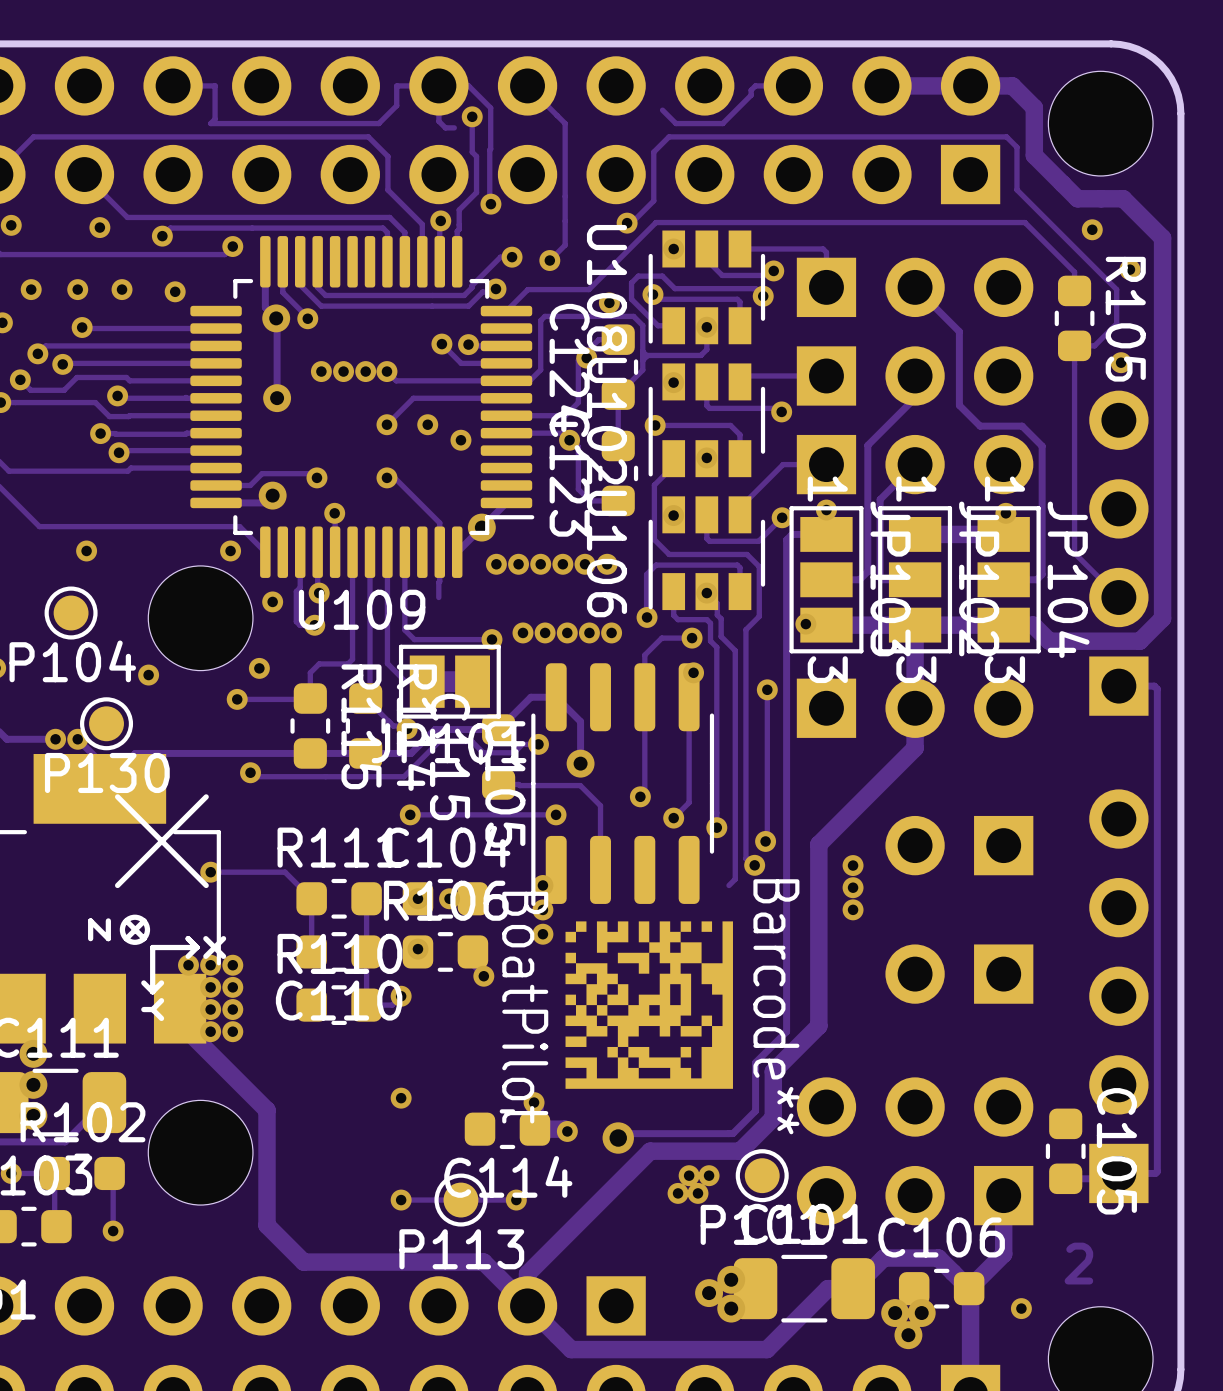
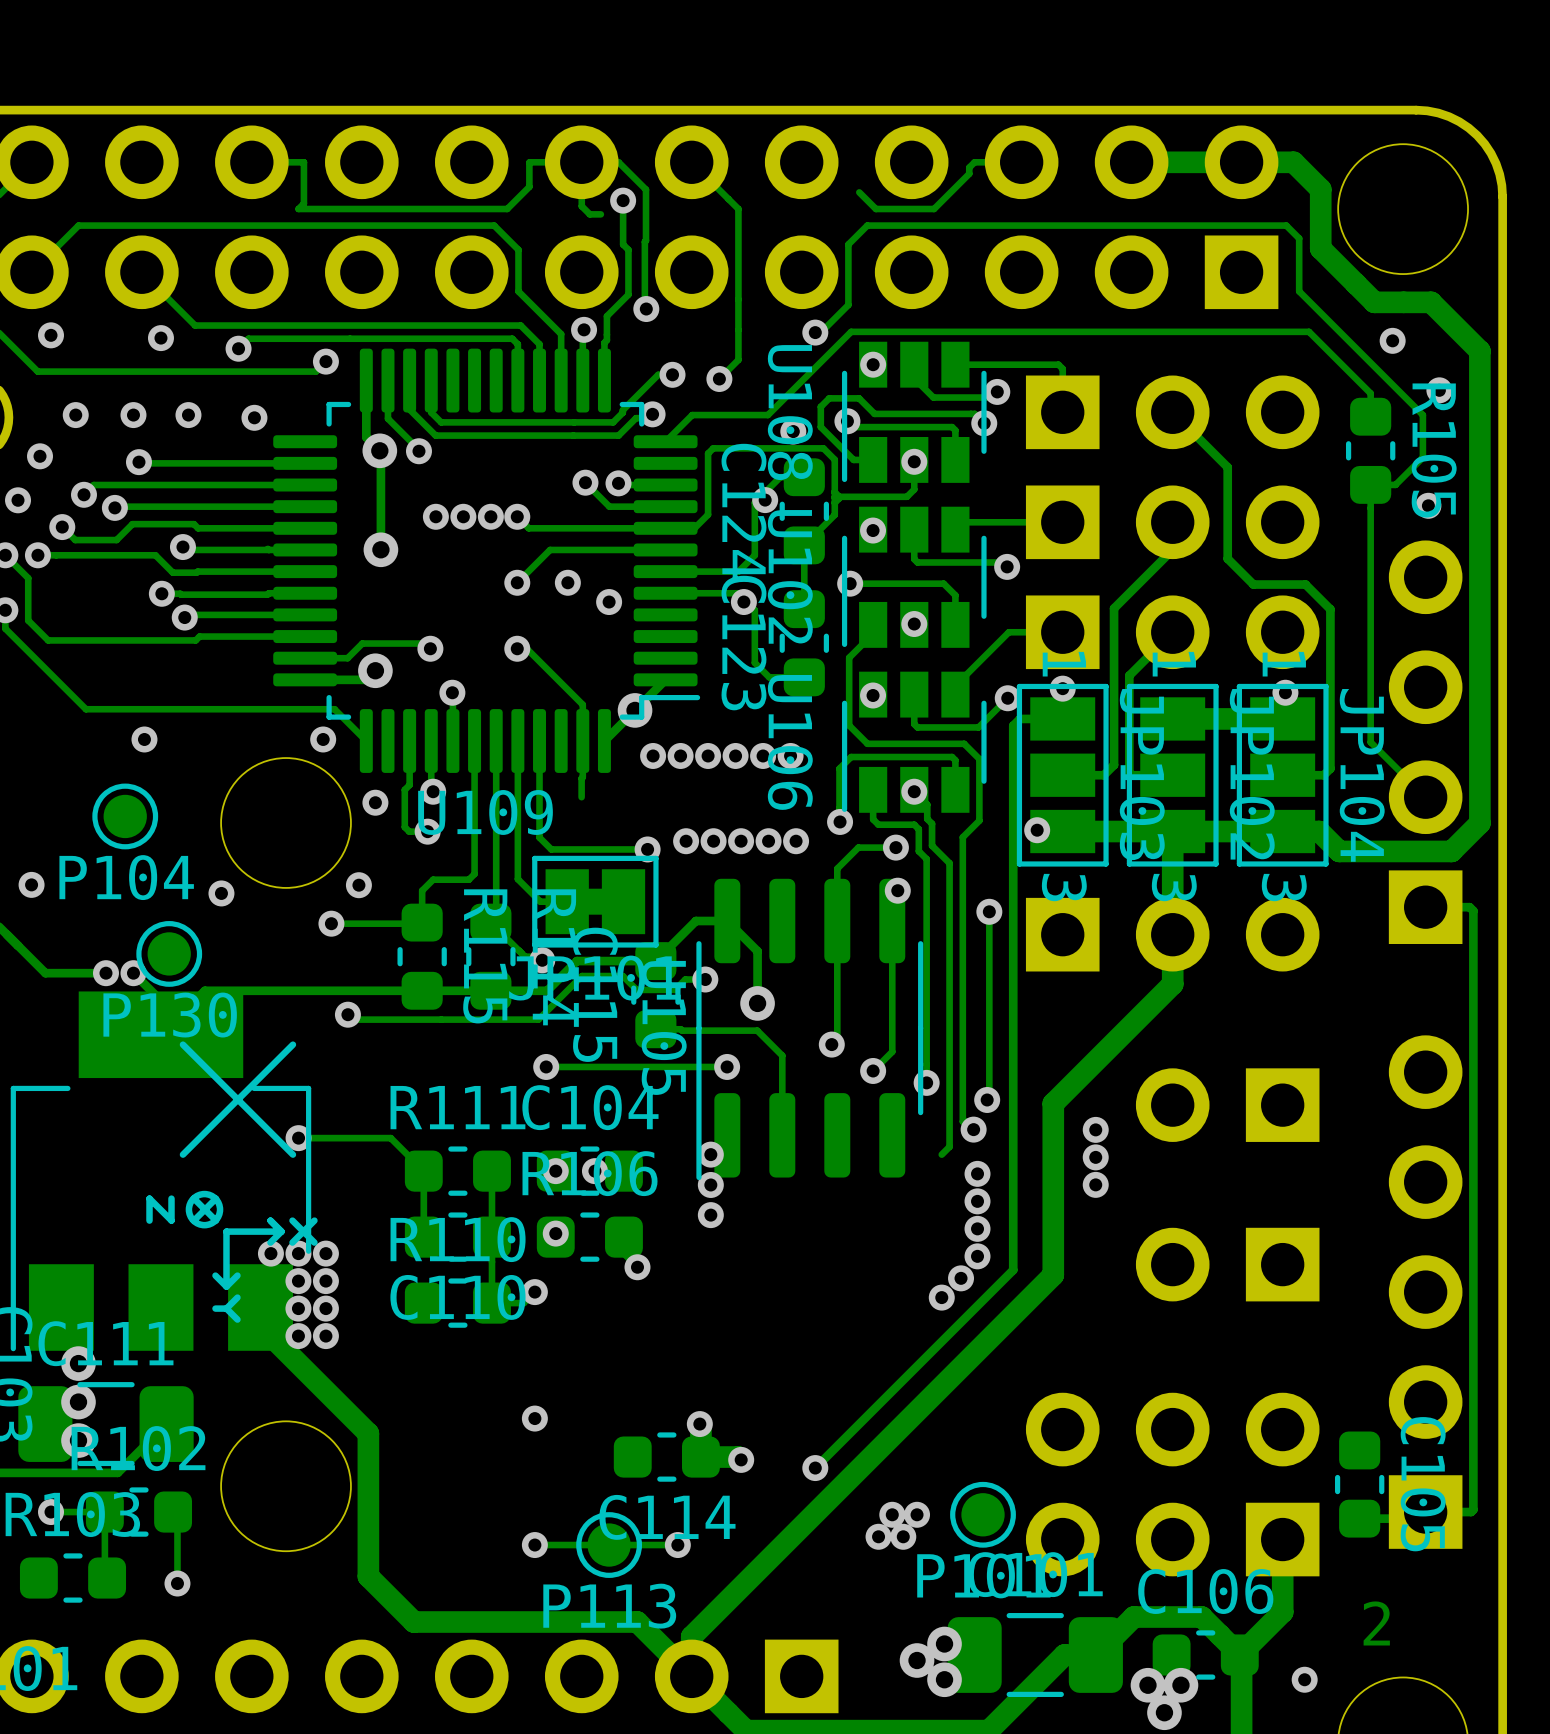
via: none -> (977, 1173)
via: none -> (977, 1201)
via: none -> (977, 1228)
via: none -> (977, 1256)
track: (786, 978) (786, 1031) (755, 1062) (755, 1110) (732, 1133) (622, 1133) (618, 1138) -> (1013, 1270) (815, 1468)
track: (818, 982) (818, 1026) (773, 1071) (773, 1118) (740, 1151) (650, 1151) -> (1053, 1275) (843, 1484)
via: none -> (961, 1278)
via: none -> (941, 1297)
Barcode**: BoatPilot (649, 1005) -> none
via size: [602, 1122, 634, 1154] -> [802, 1455, 829, 1482]

